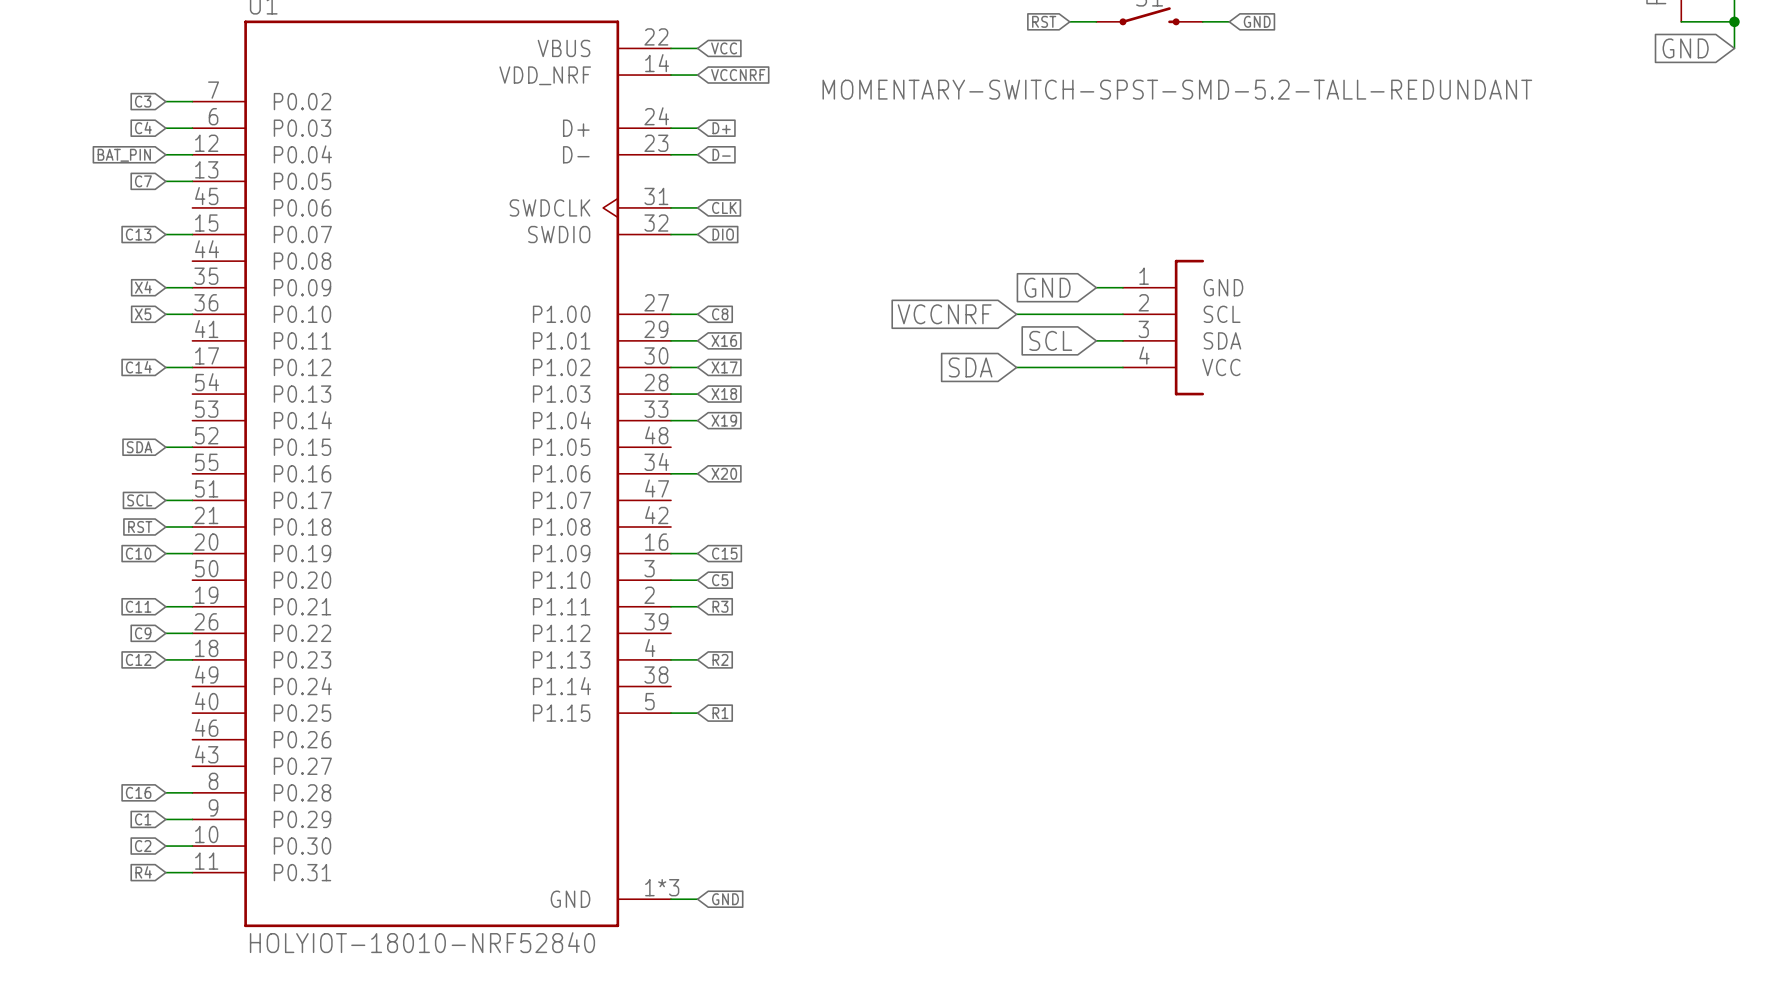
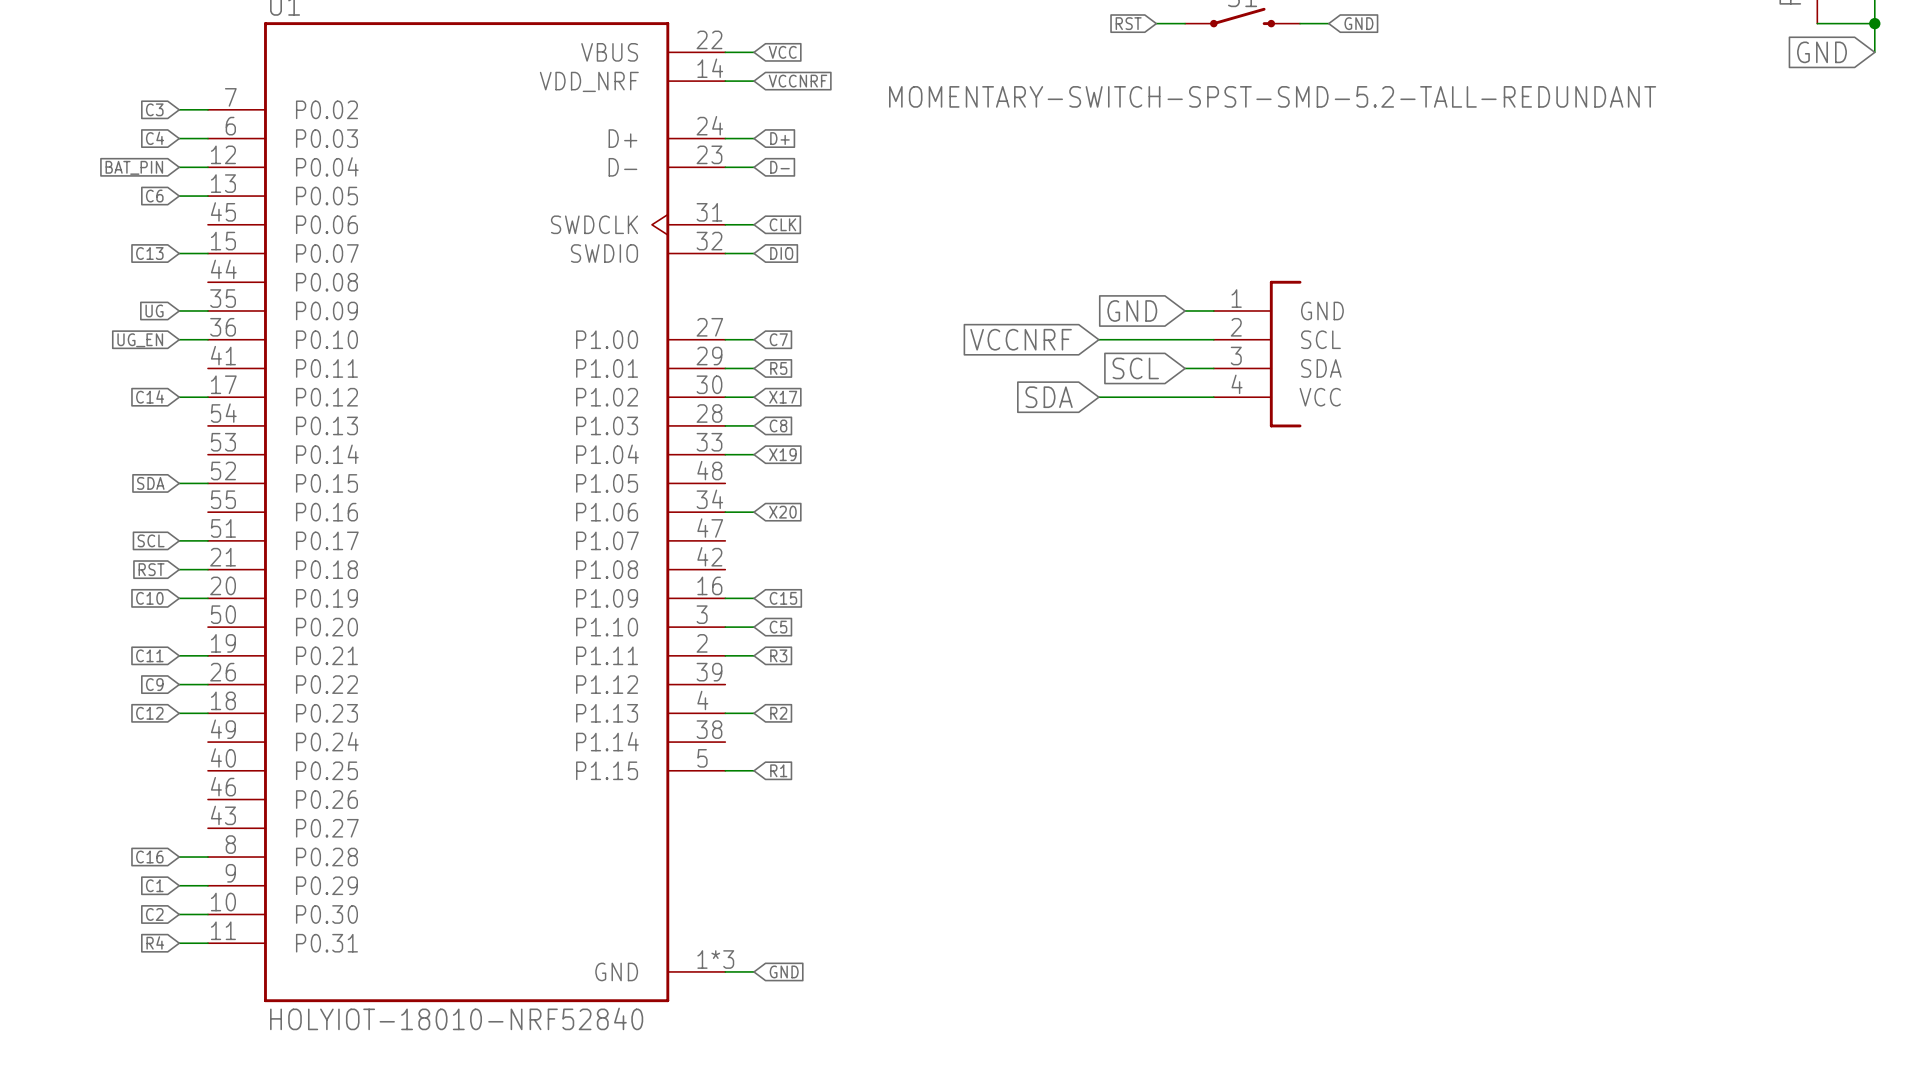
global label: C7 (143, 181) -> C6 (154, 196)
global label: X4 (143, 287) -> UG (154, 310)
global label: X5 (143, 314) -> UG_EN (140, 340)
global label: C8 (720, 314) -> C7 (778, 339)
global label: X16 (724, 340) -> R5 (778, 368)
global label: X18 (724, 394) -> C8 (778, 425)

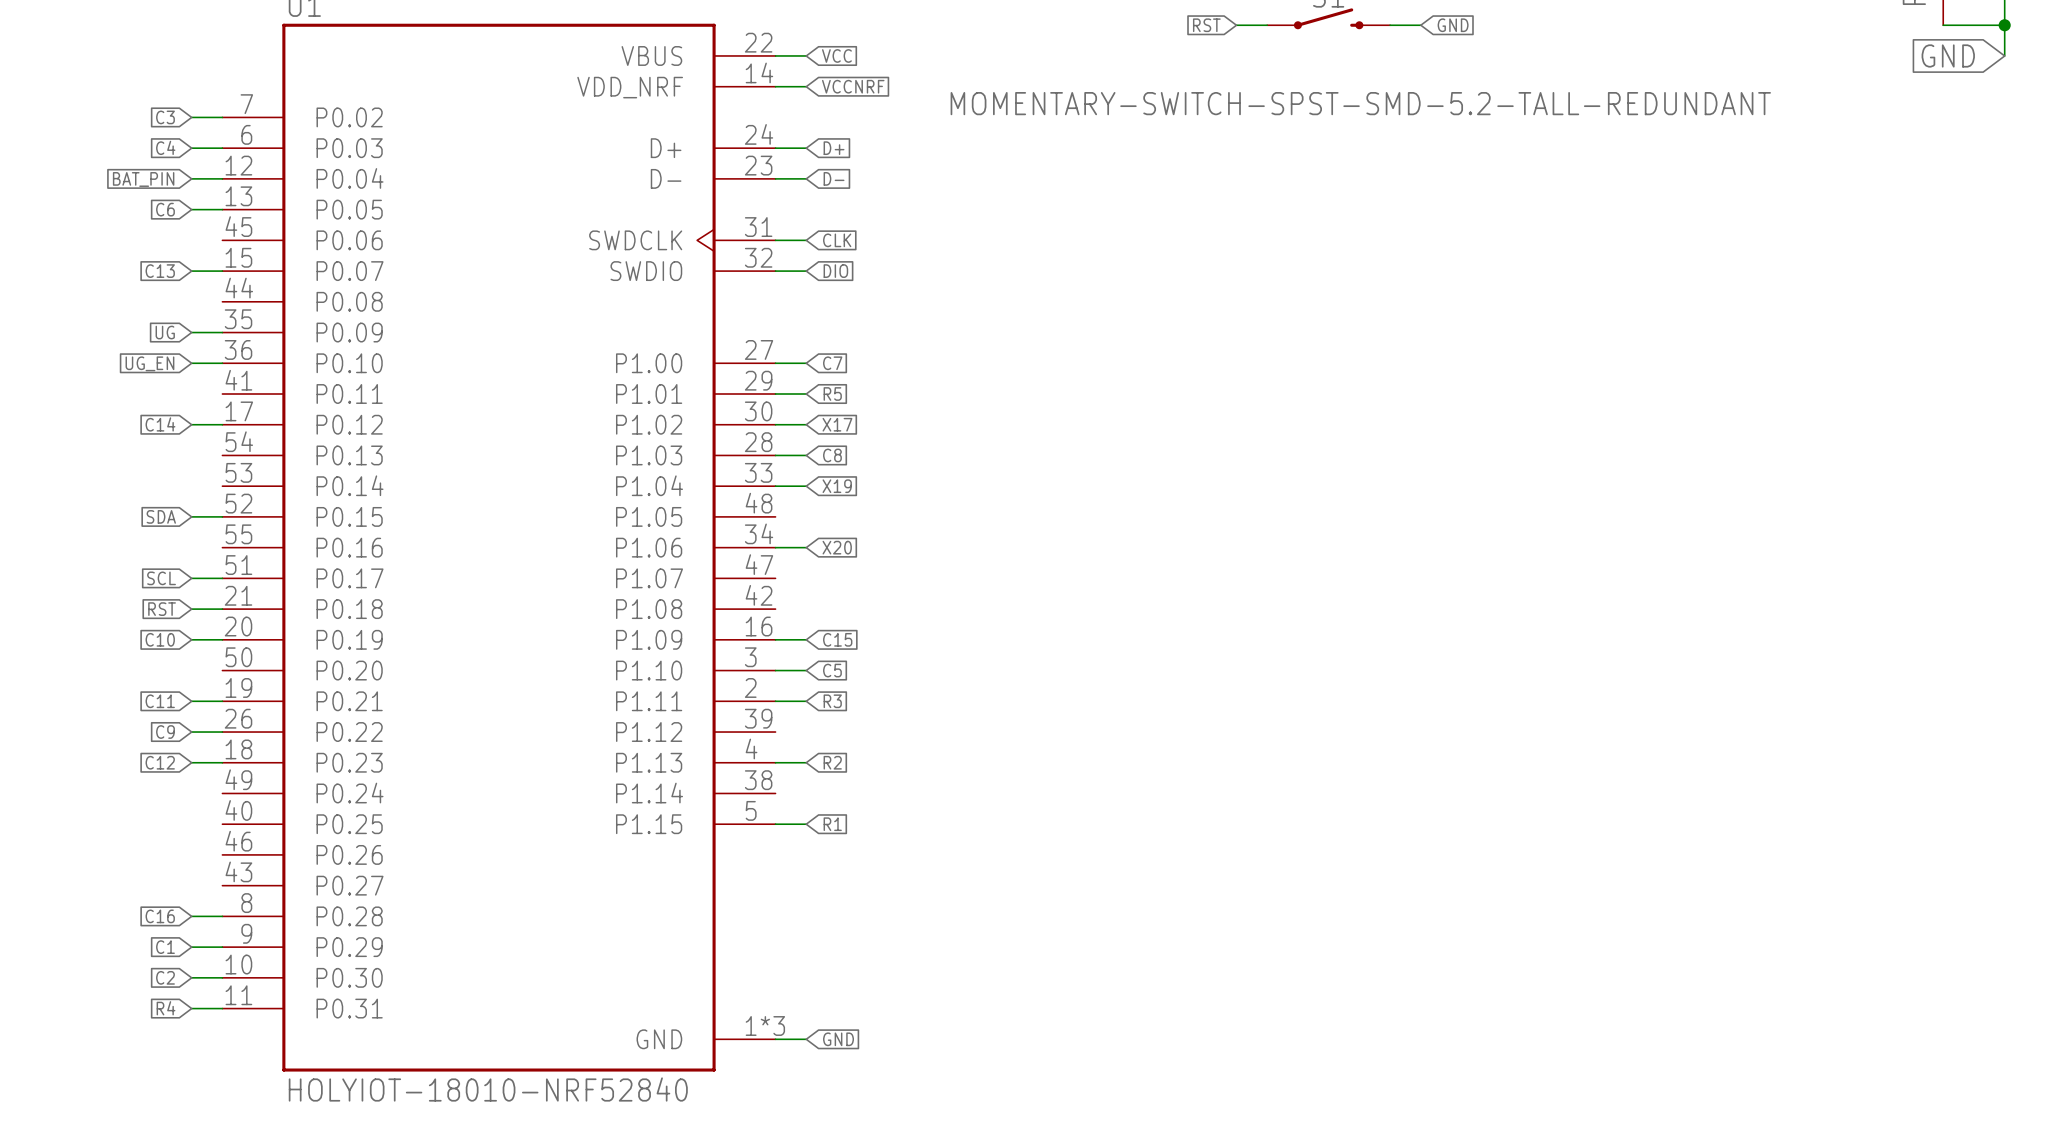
global label: GND (1132, 310) -> none
wire: (1185, 310) (1213, 310) -> none
global label: VCCNRF (1021, 339) -> none
wire: (1098, 339) (1213, 339) -> none
part: (1257, 354) -> none
global label: SCL (1135, 368) -> none
wire: (1185, 368) (1213, 368) -> none
global label: SDA (1049, 397) -> none
wire: (1098, 397) (1213, 397) -> none

